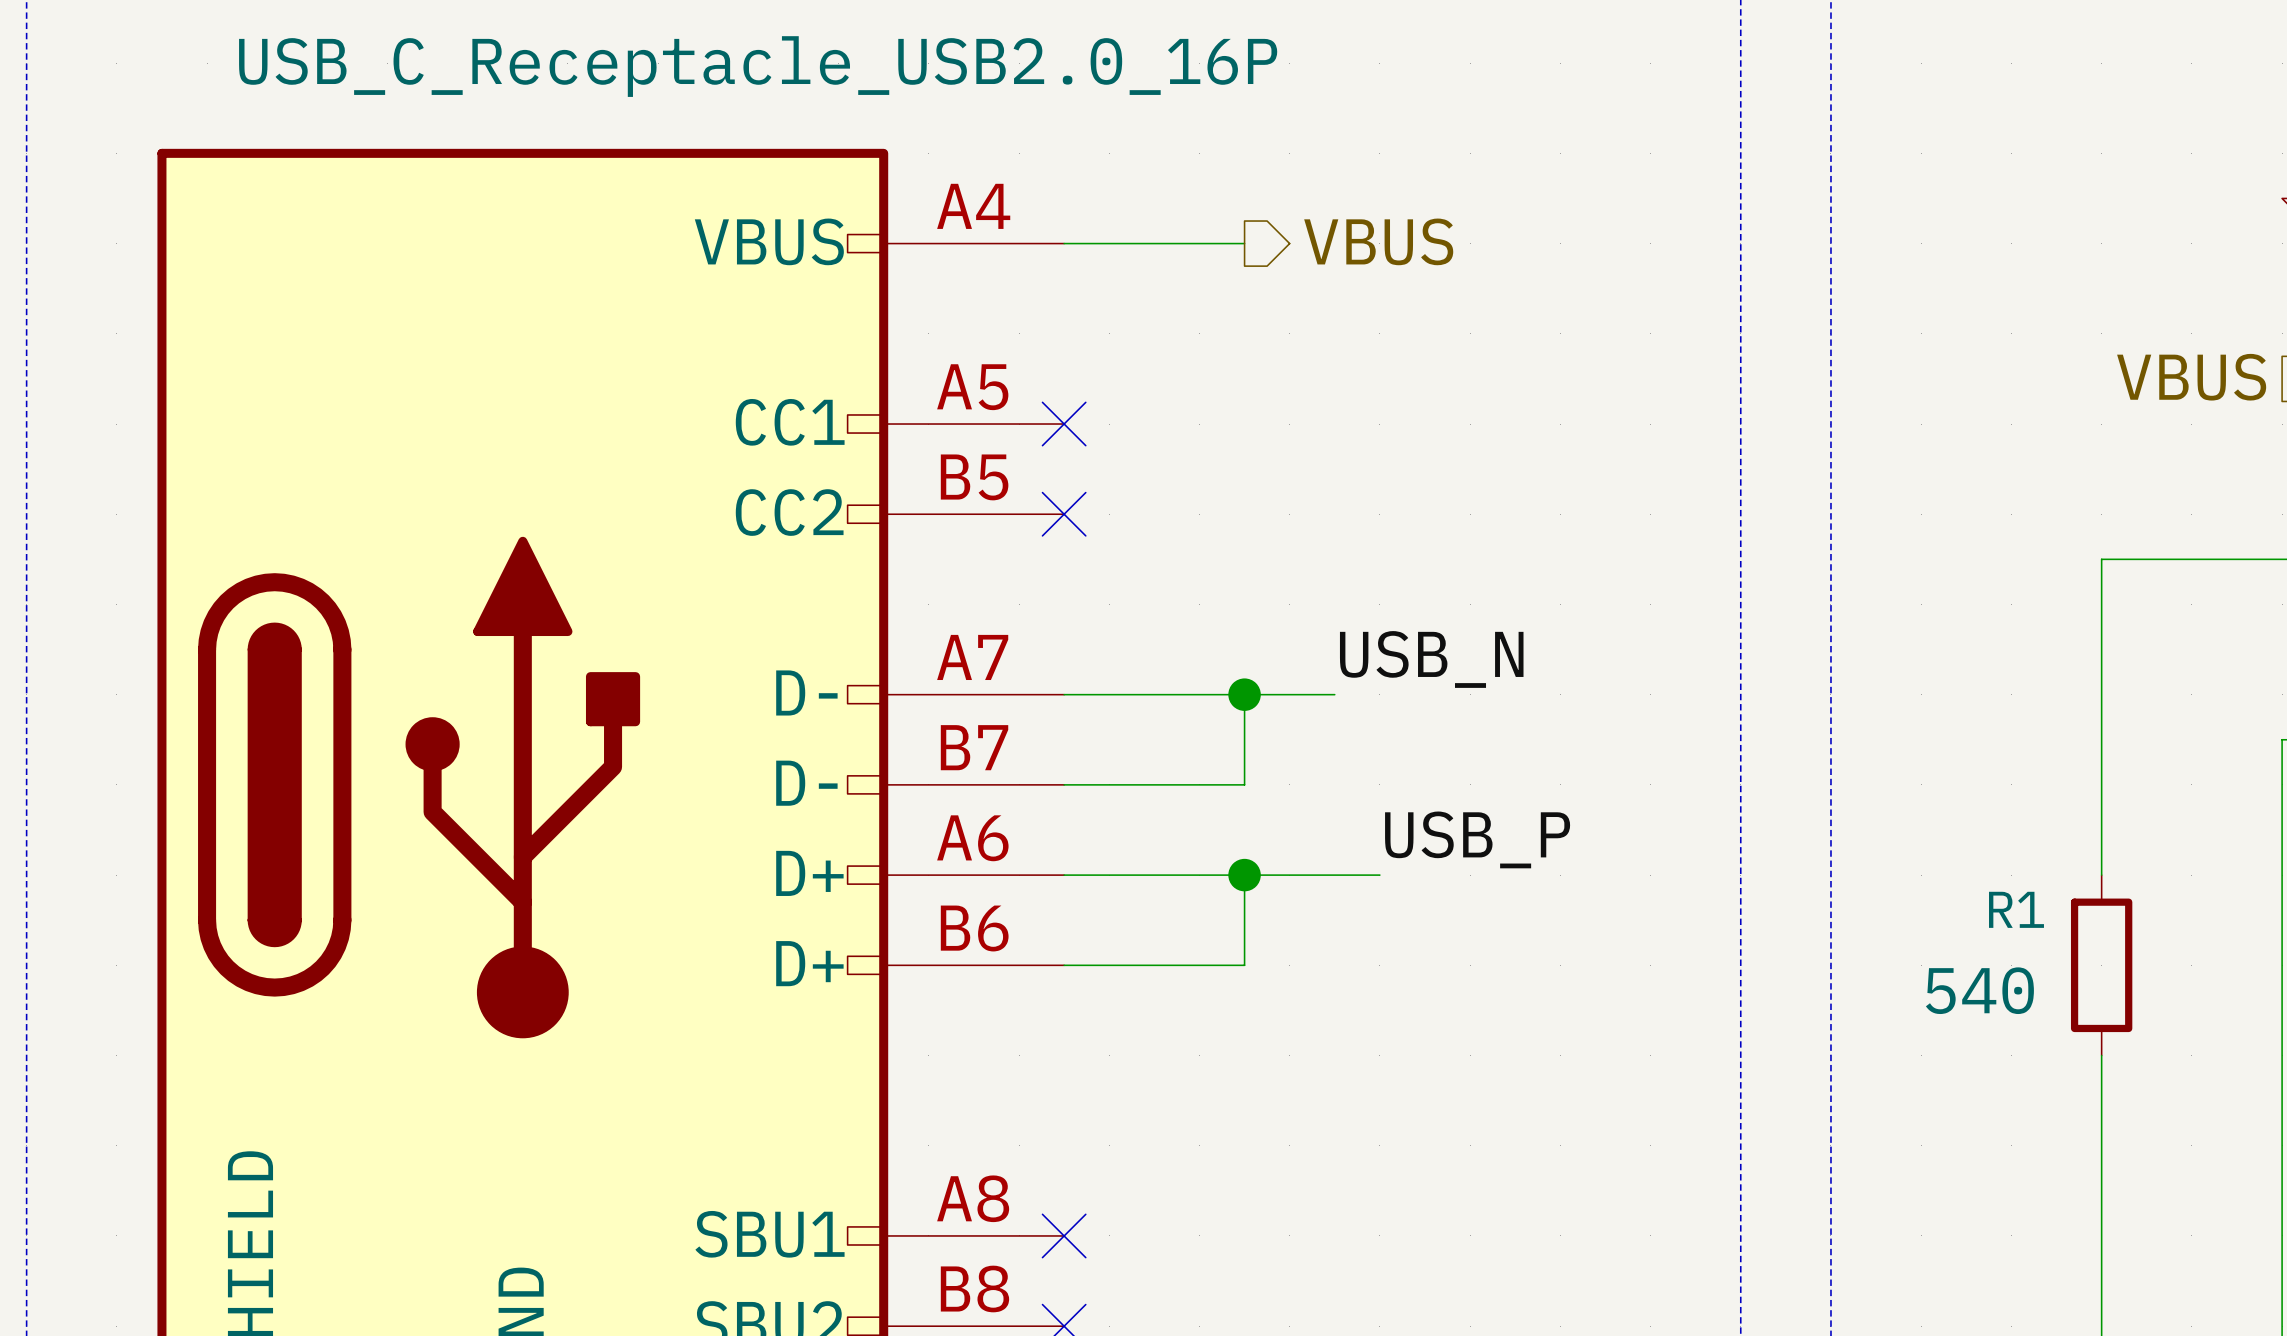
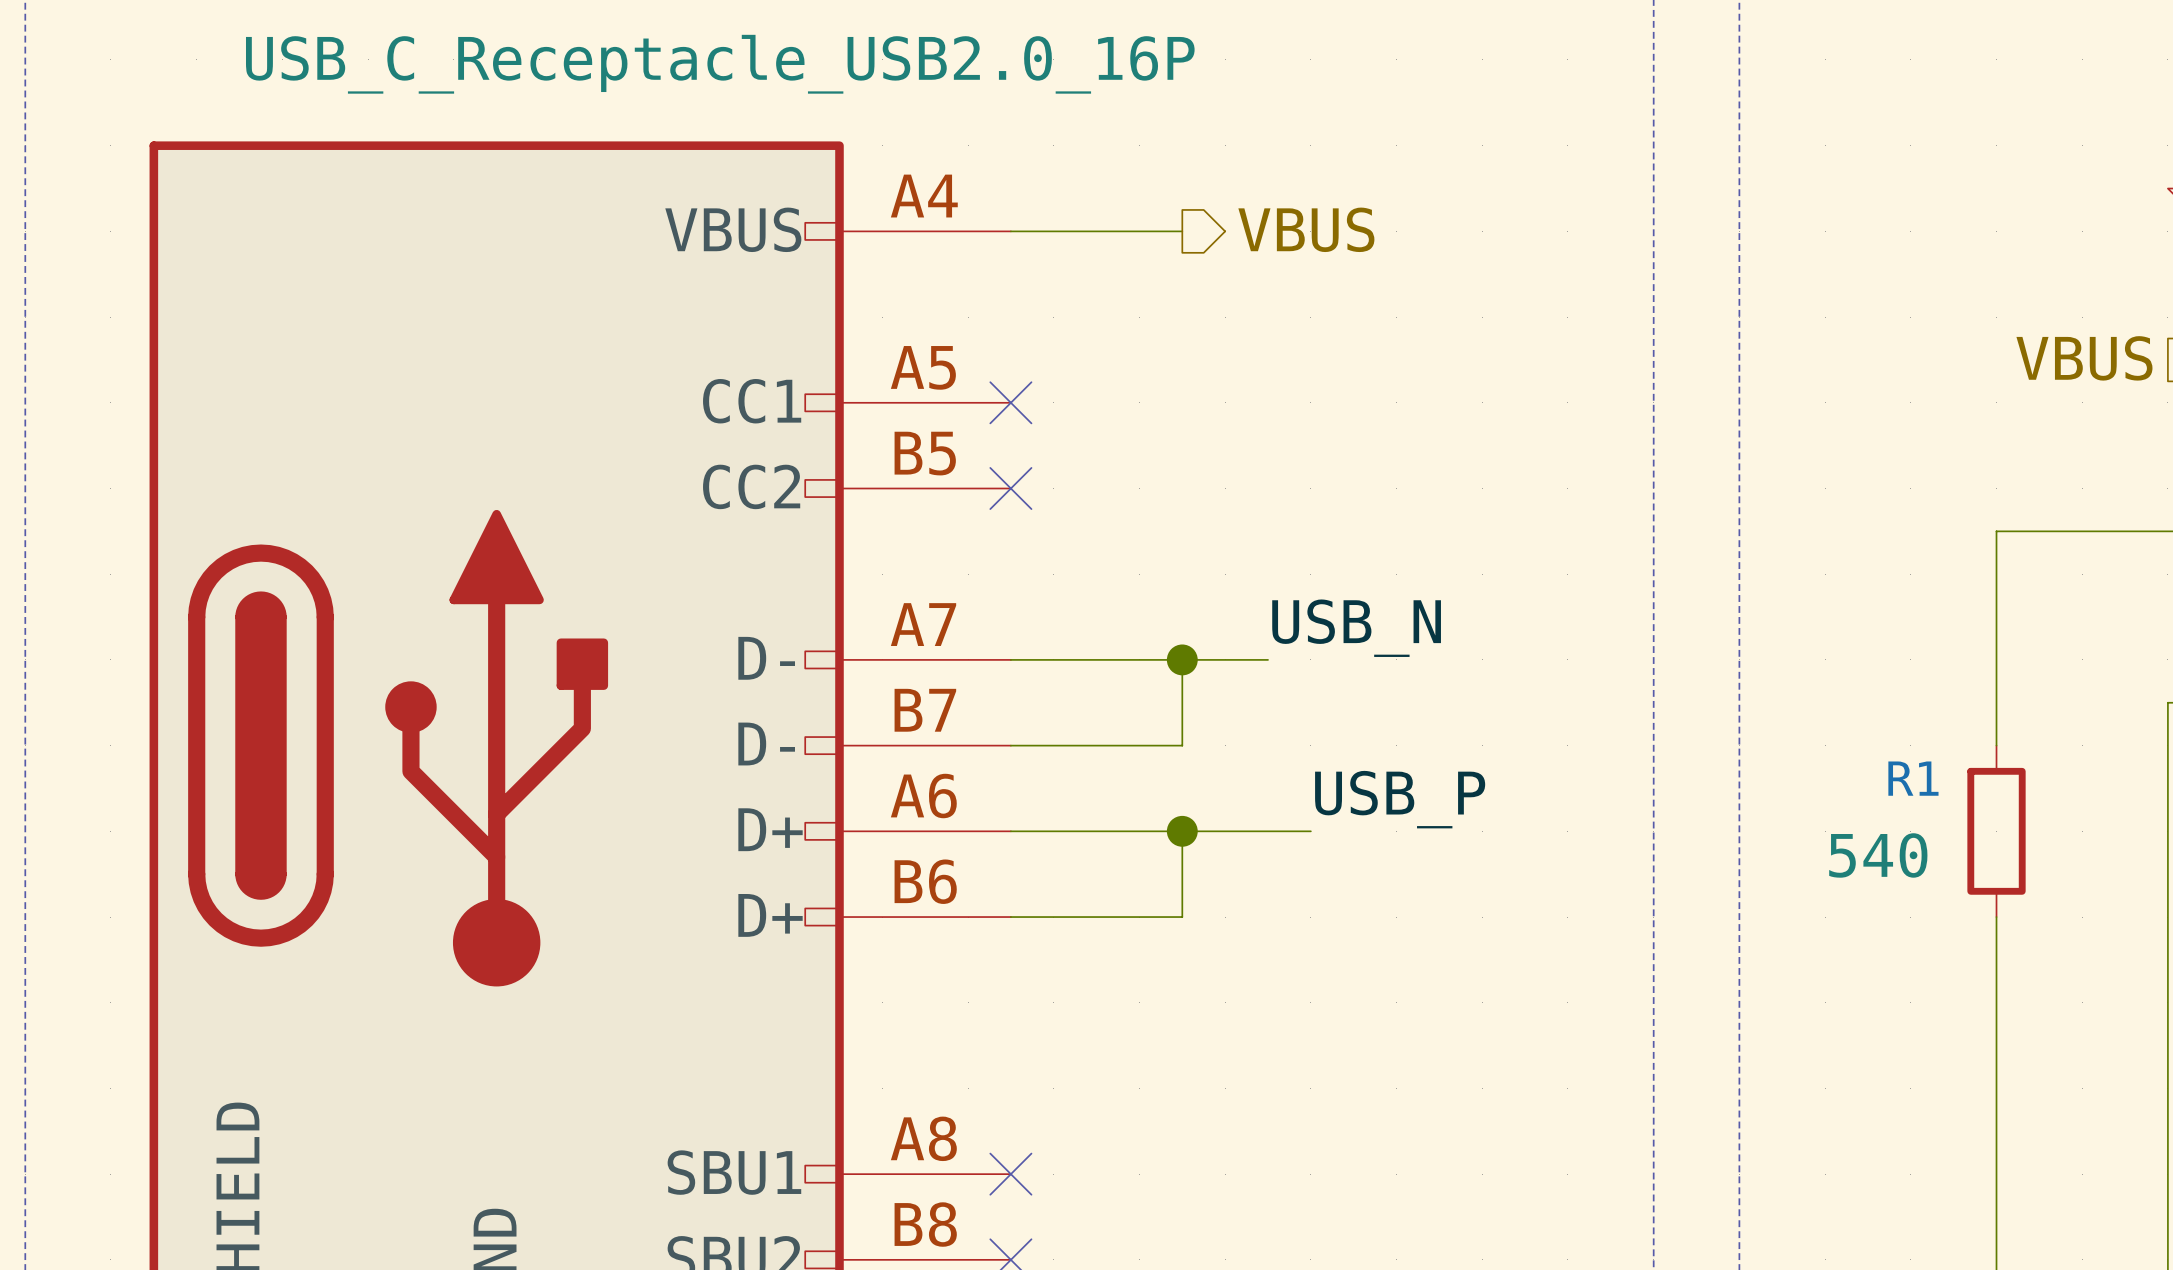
wire: (2101, 784) (2101, 875) -> (1996, 917) (1996, 1002)
R1 position: (2101, 965) -> (1996, 831)

